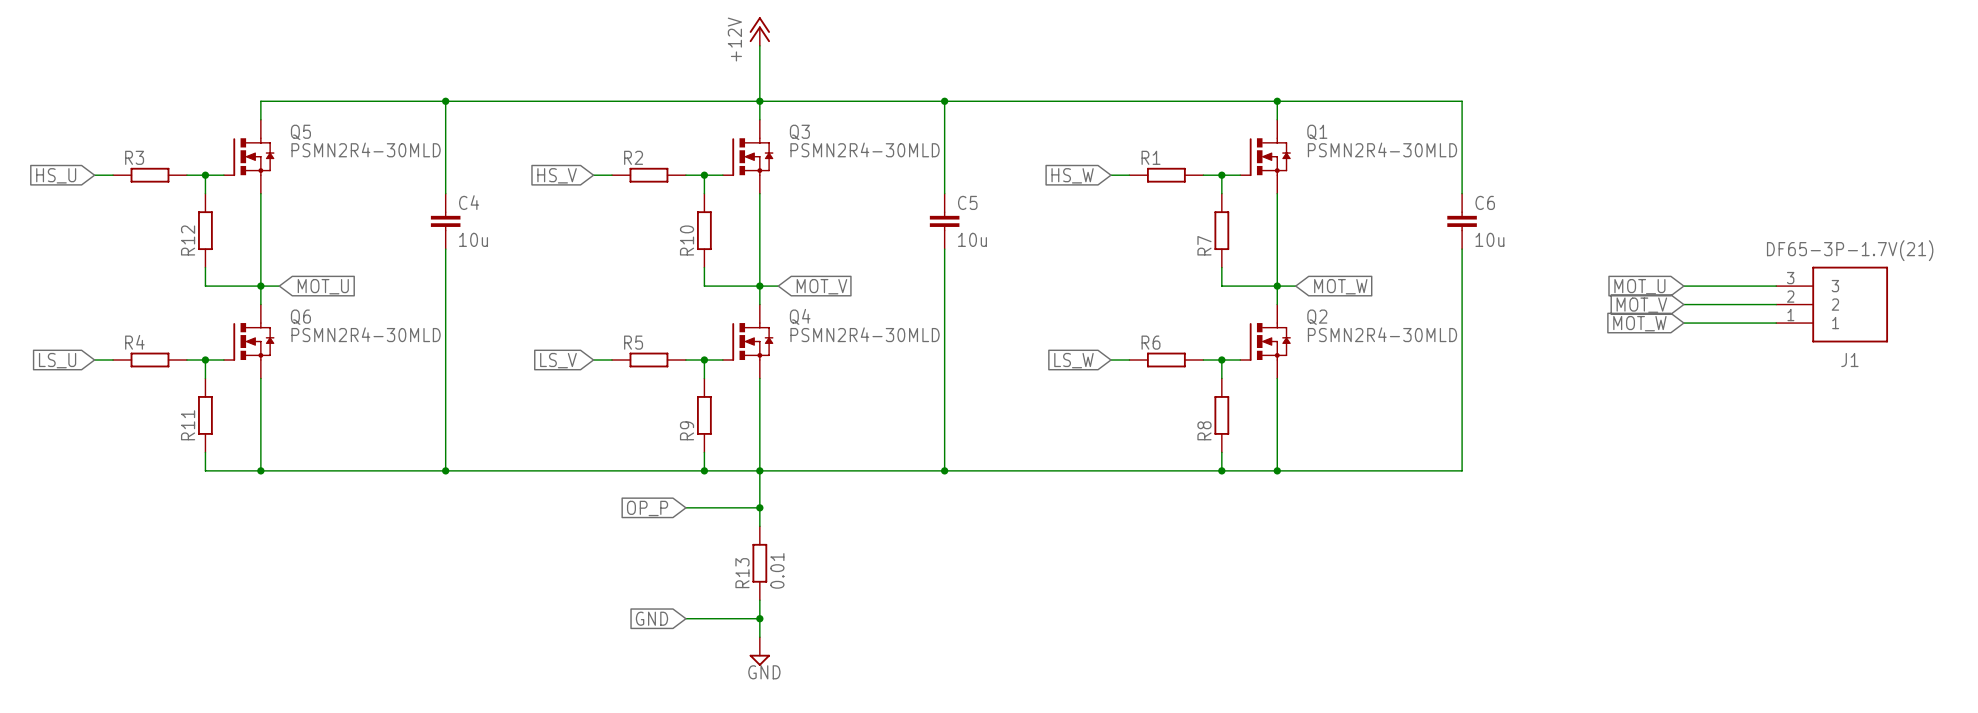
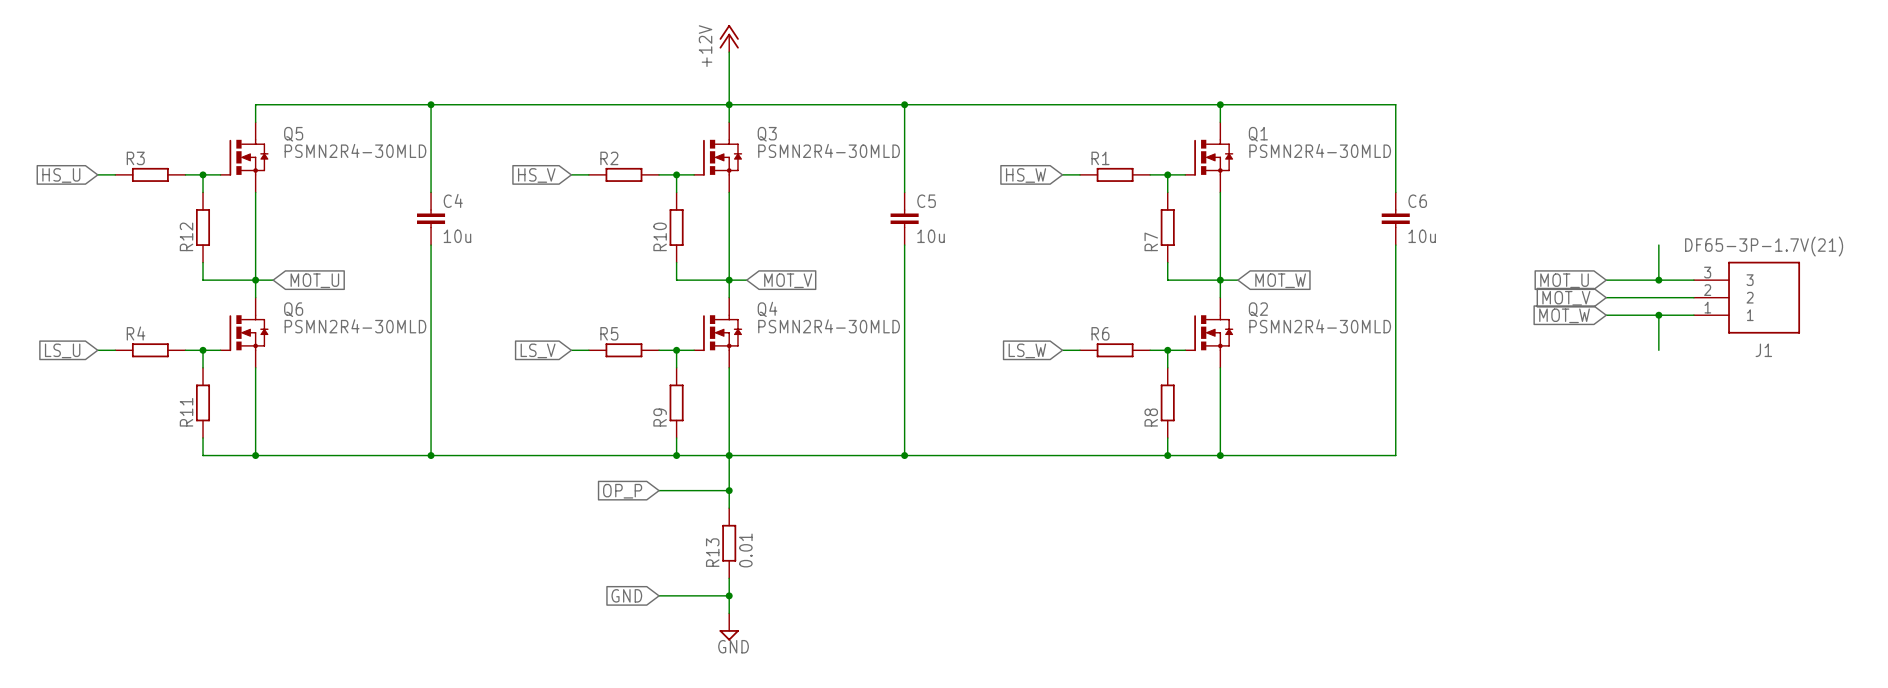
wire: none -> (1658, 245) (1658, 280)
junction: none -> (1658, 280)
wire: none -> (1658, 315) (1658, 350)
junction: none -> (1658, 315)

